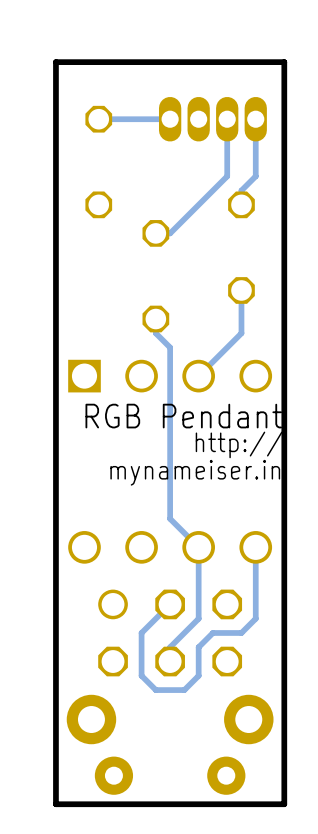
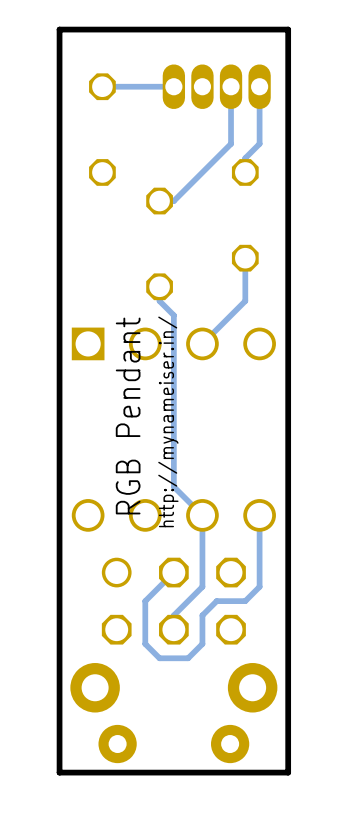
text rotation: 0° (183, 416) -> 90° counterclockwise (128, 416)
text: http:// (239, 444) -> none
text: mynameiser.in (195, 472) -> http://mynameiser.in/ (168, 421)

